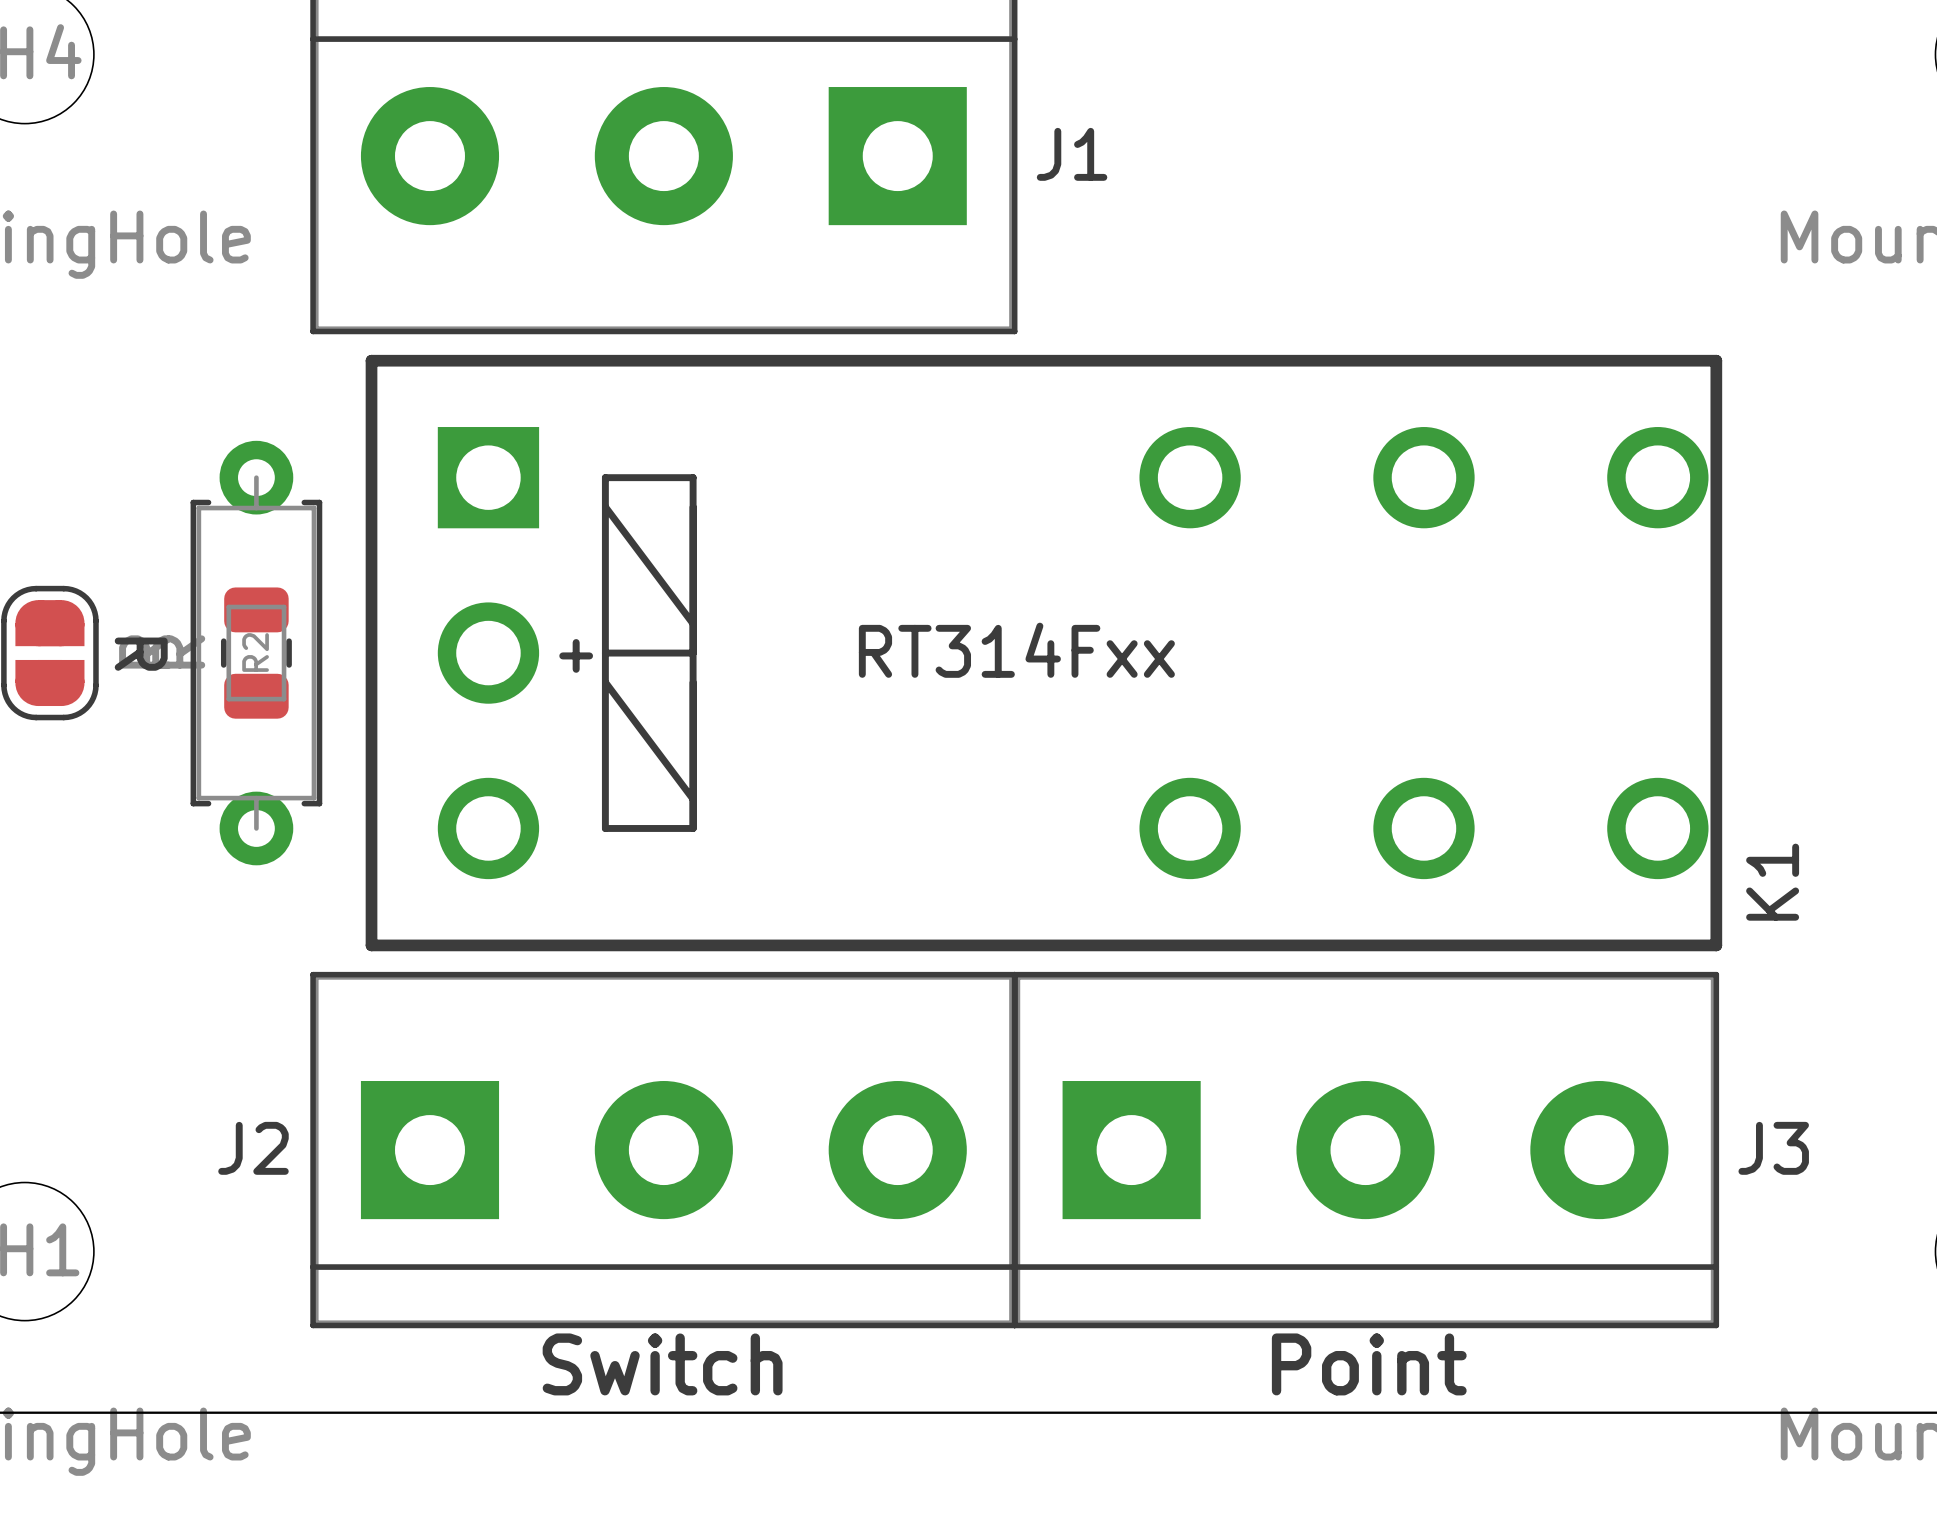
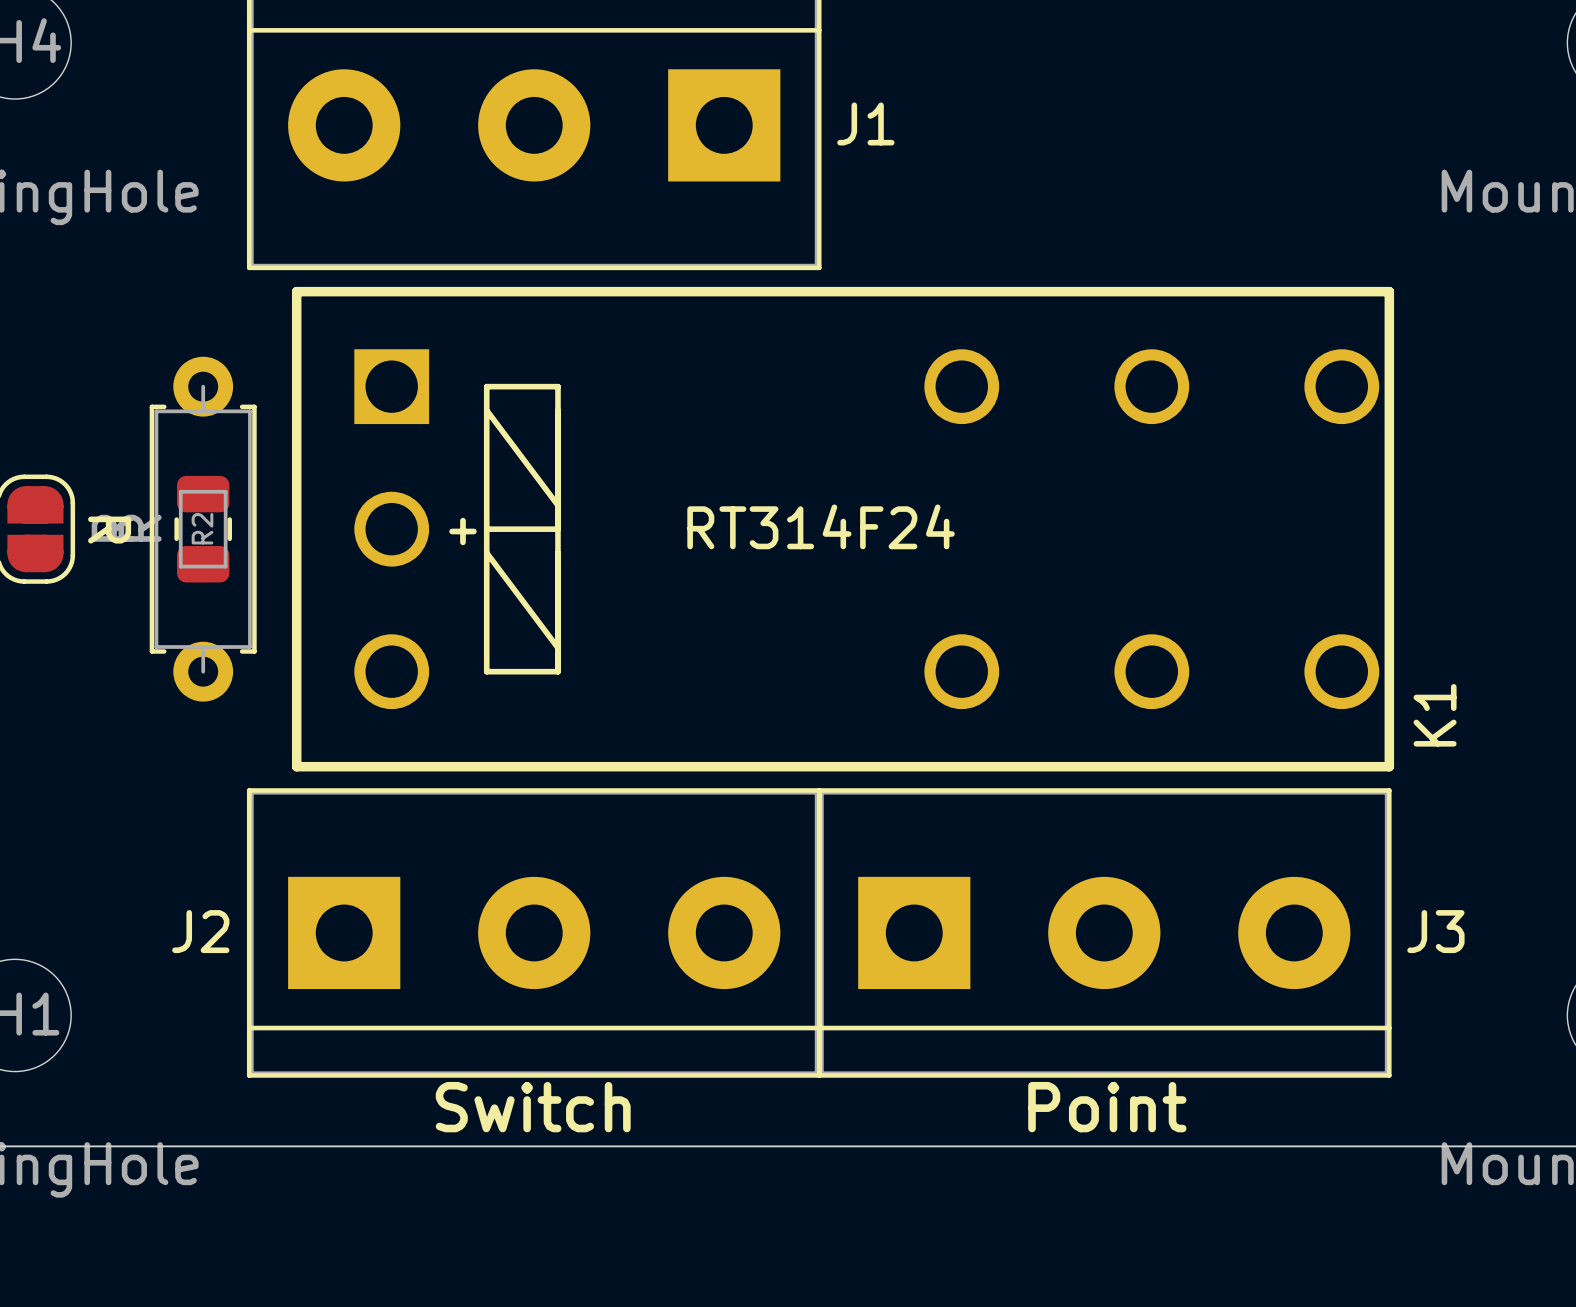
K1 footprint: [365, 354, 1723, 952] -> [291, 286, 1395, 772]
K1 value: RT314Fxx (1016, 650) -> RT314F24 (821, 526)

